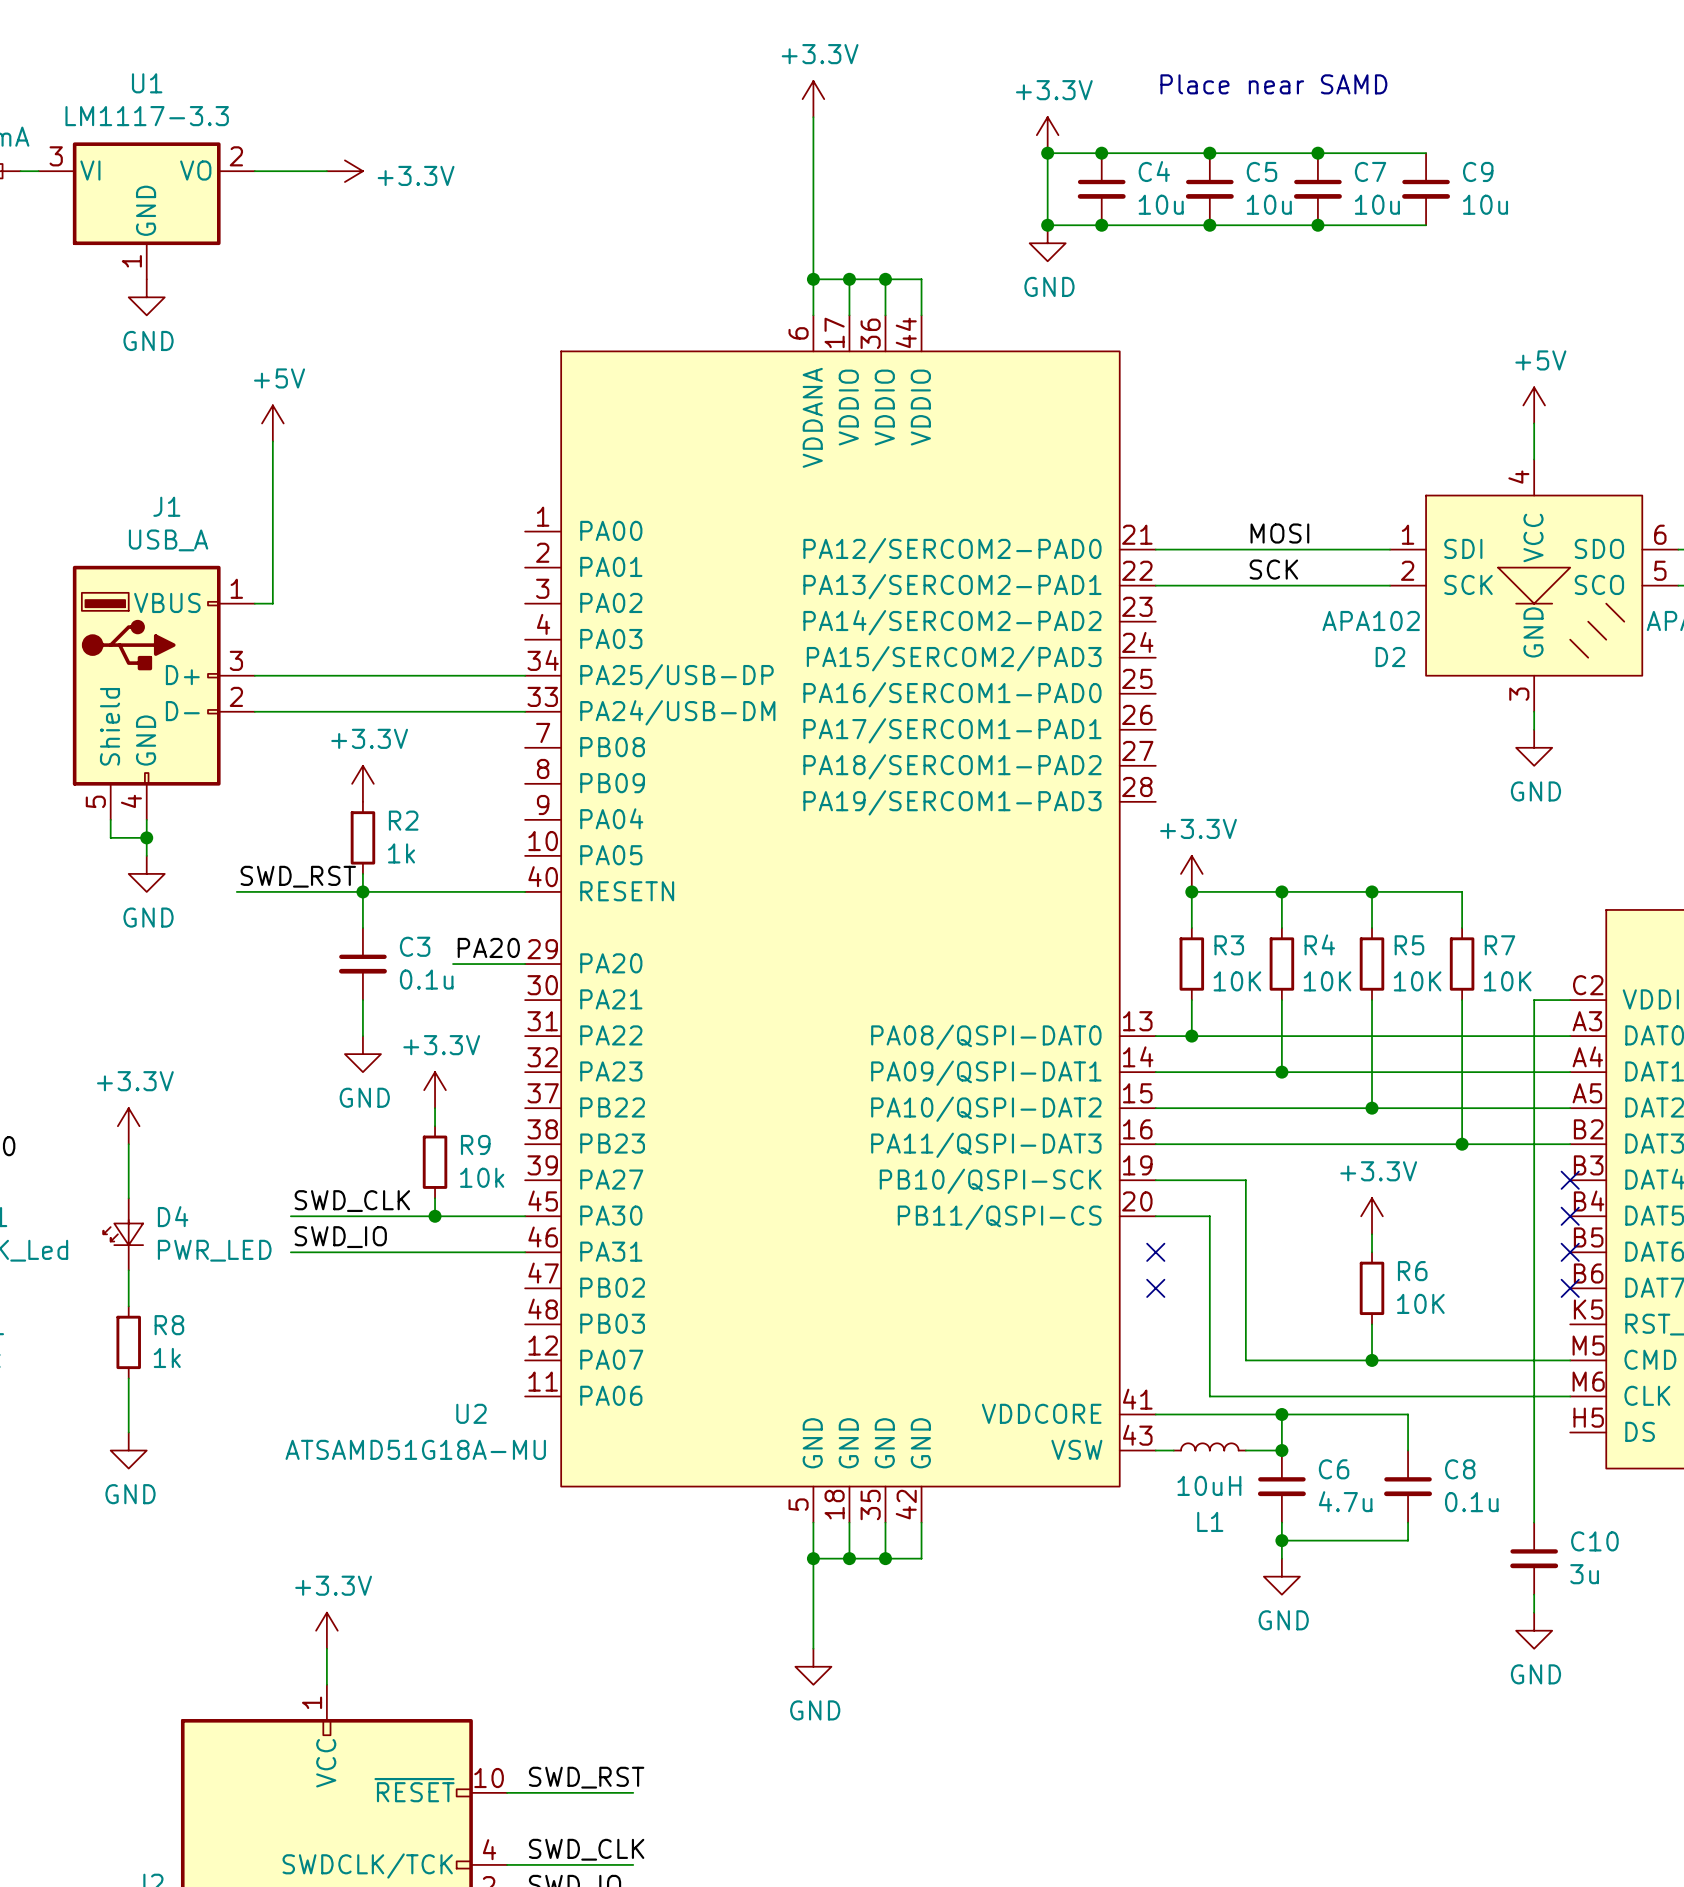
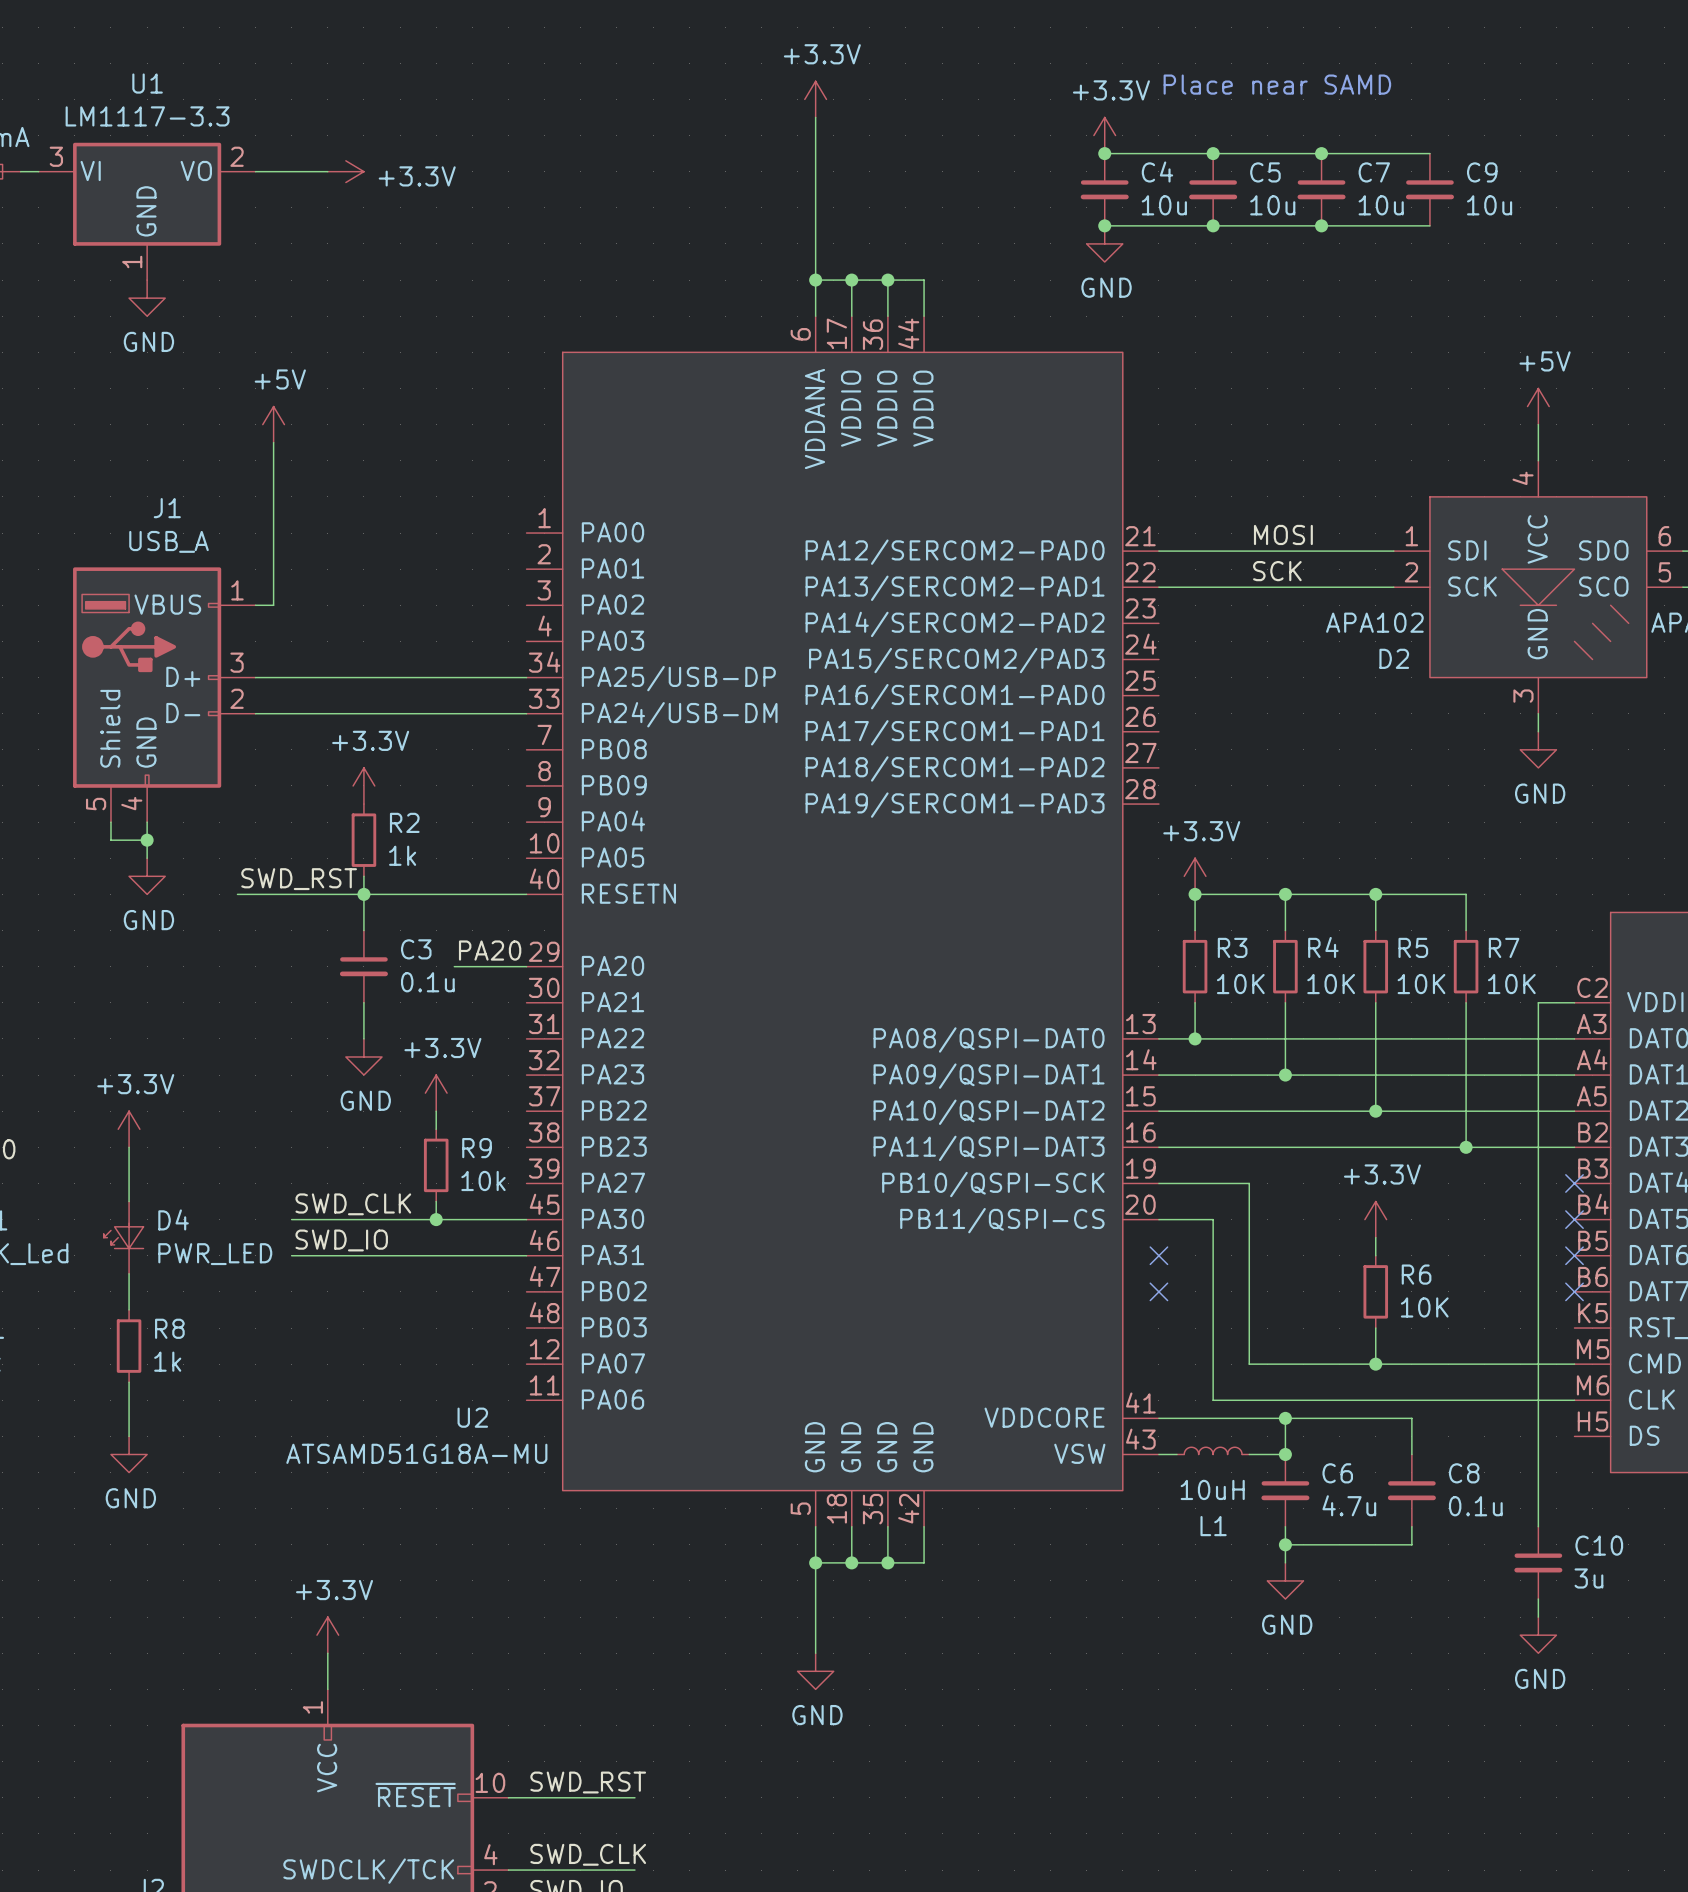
power symbol position: +3.3V (1047, 135) -> +3.3V (1104, 135)
junction: (1047, 153) -> none
wire: (1101, 153) (1047, 153) (1047, 225) (1101, 225) -> none
junction: (1047, 225) -> none
power symbol position: GND (1047, 243) -> GND (1104, 243)

